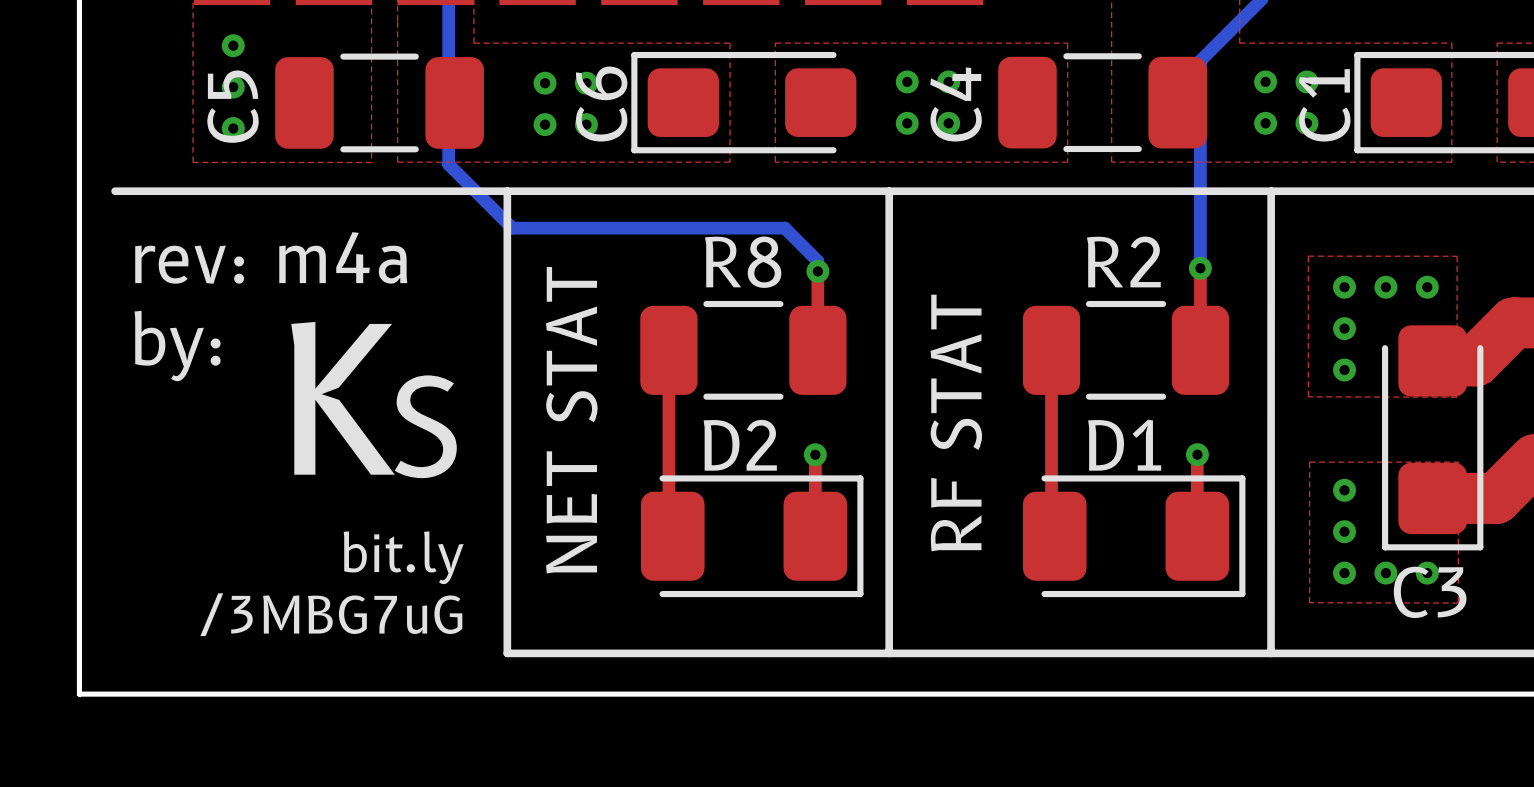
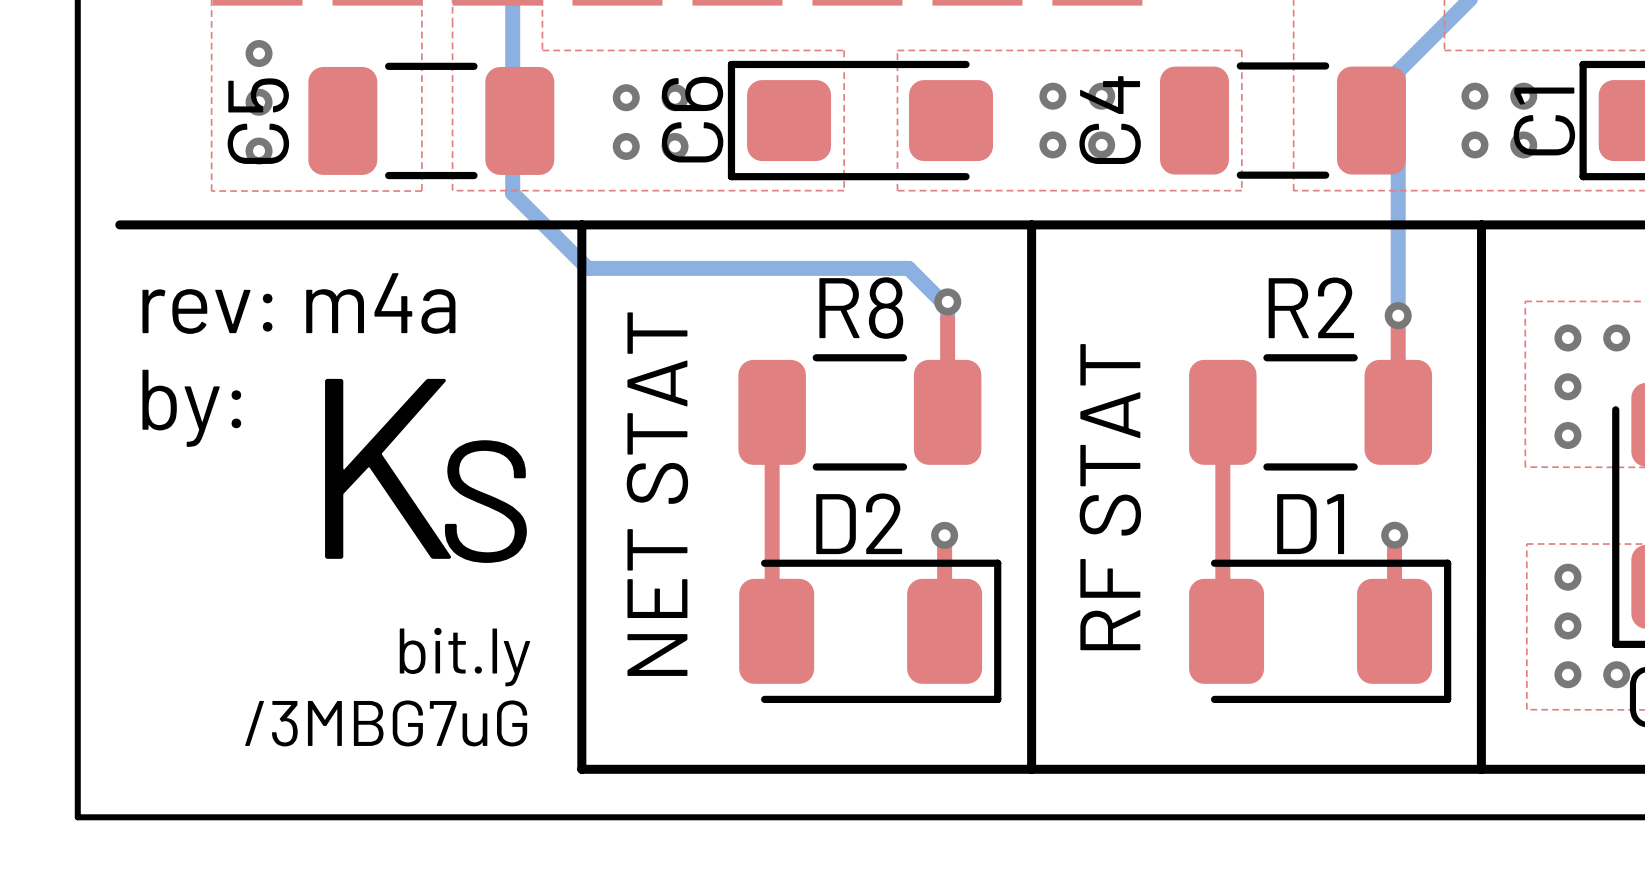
via position: (817, 271) -> (947, 301)

